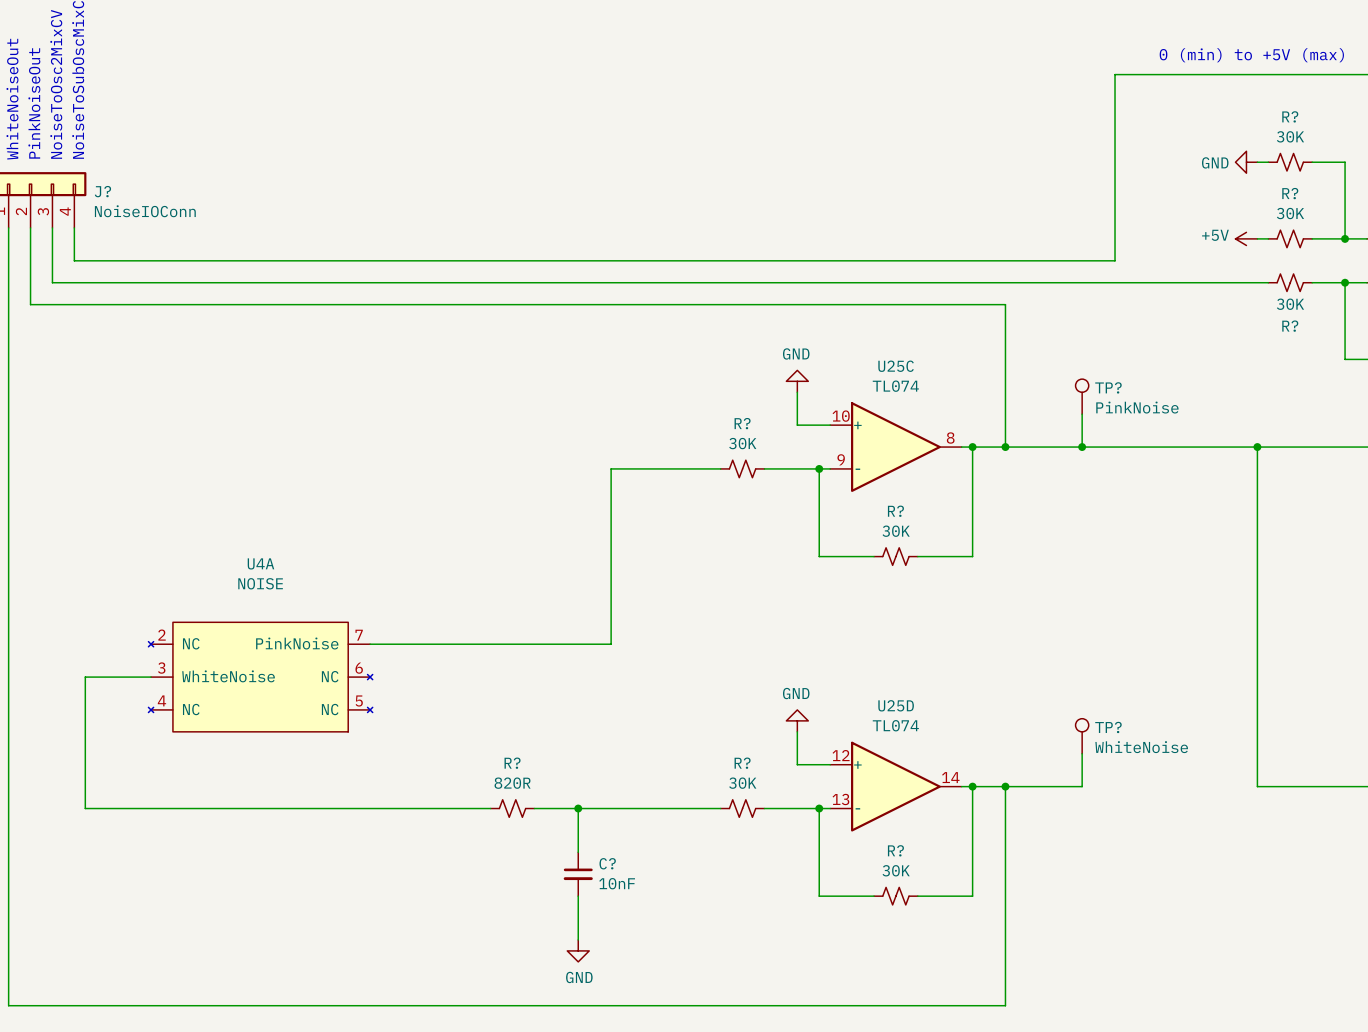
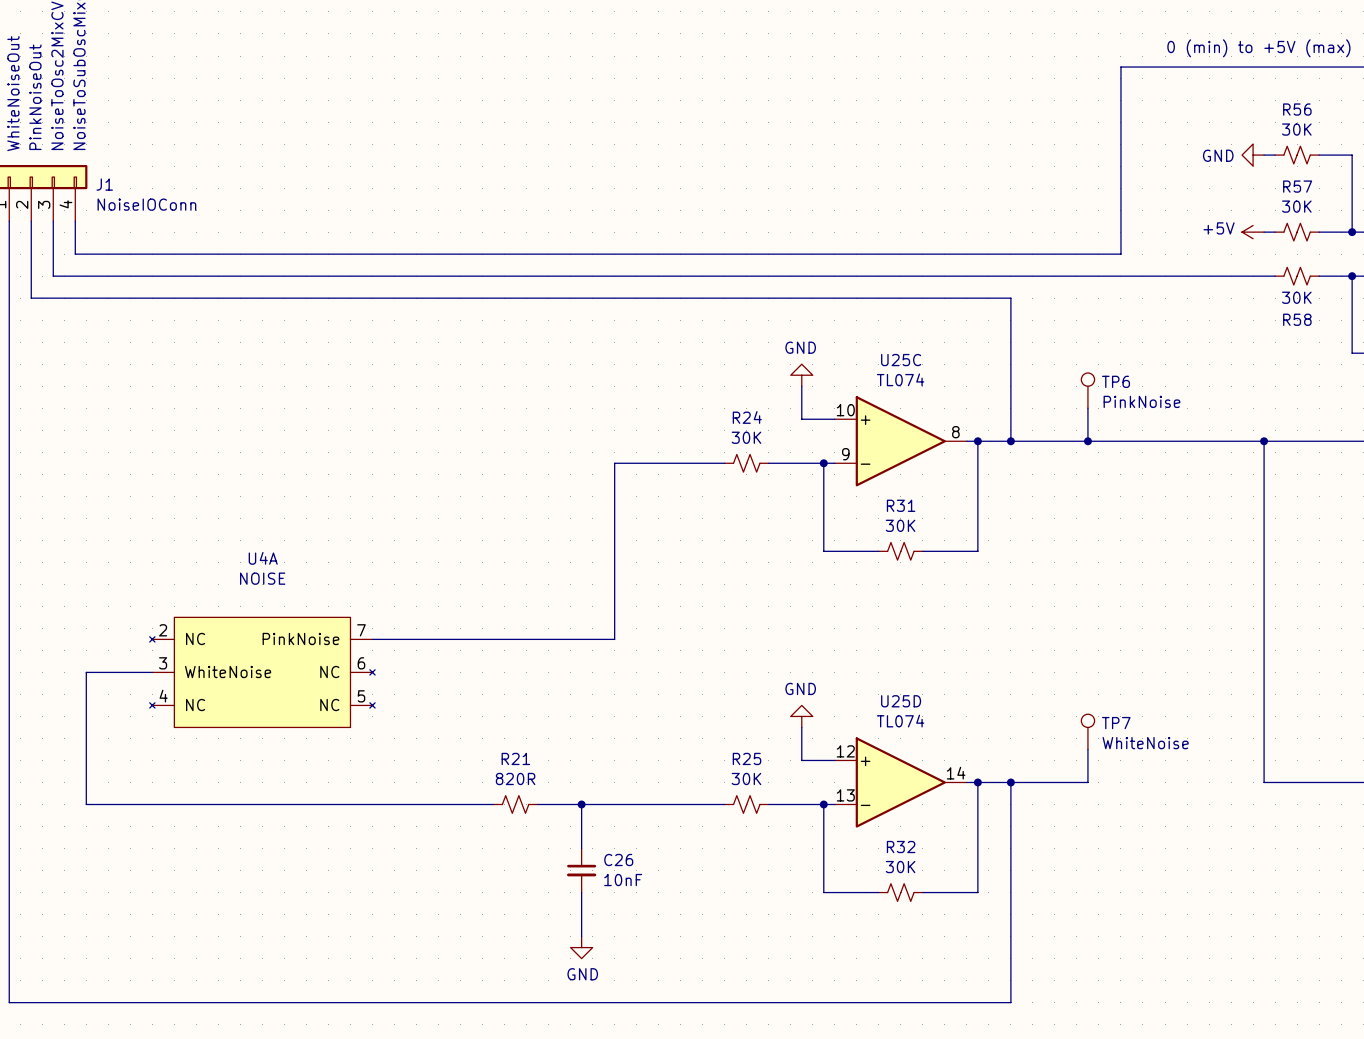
R? name: R? (1290, 116) -> R56 (1297, 109)
J? name: J? (102, 191) -> J1 (104, 184)
R? name: R? (1290, 193) -> R57 (1297, 186)
R? name: R? (1290, 326) -> R58 (1297, 319)
TP? name: TP? (1108, 387) -> TP6 (1116, 381)
R? name: R? (742, 423) -> R24 (747, 417)
R? name: R? (895, 511) -> R31 (901, 505)
TP? name: TP? (1108, 727) -> TP7 (1116, 723)
R? name: R? (512, 763) -> R21 (515, 758)
R? name: R? (742, 763) -> R25 (747, 758)
R? name: R? (895, 850) -> R32 (901, 847)
C? name: C? (607, 863) -> C26 (618, 860)

